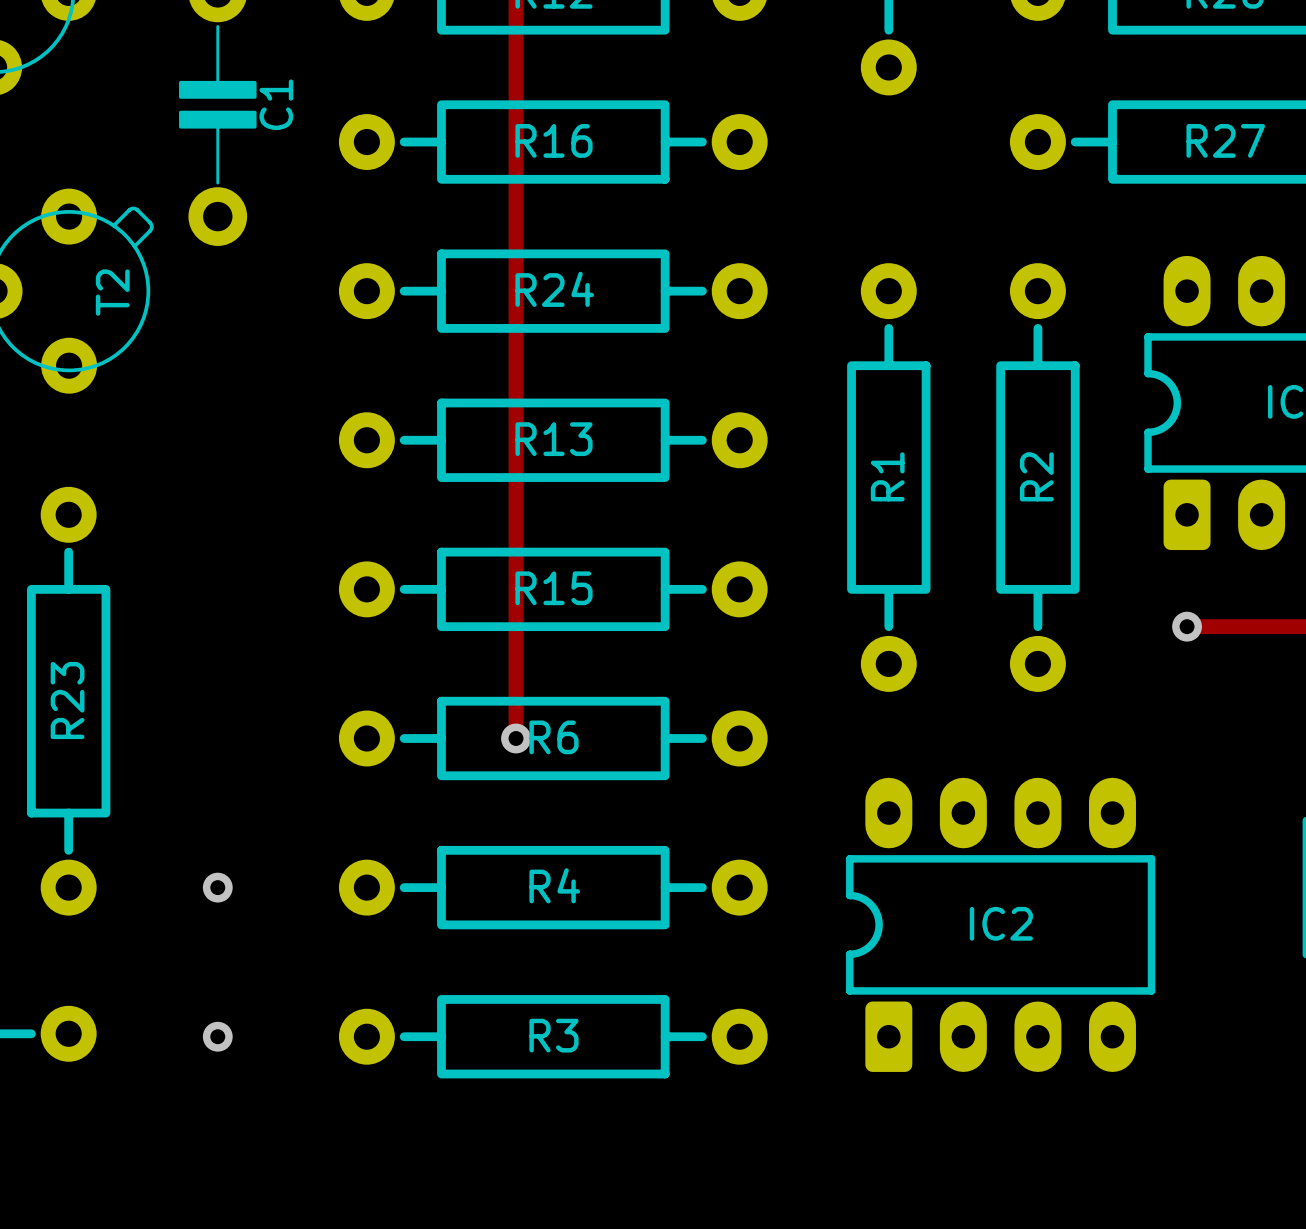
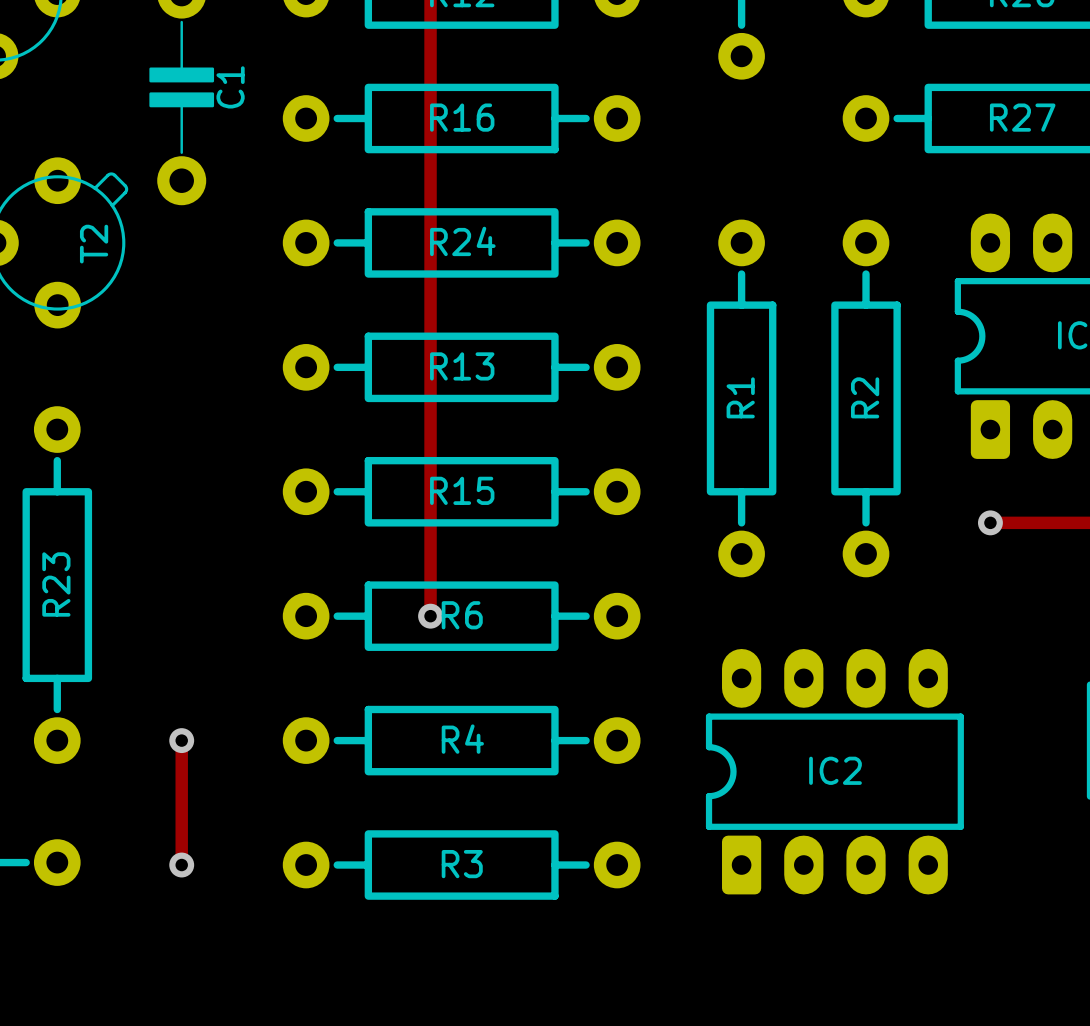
track: none -> (181, 740) (181, 865)

